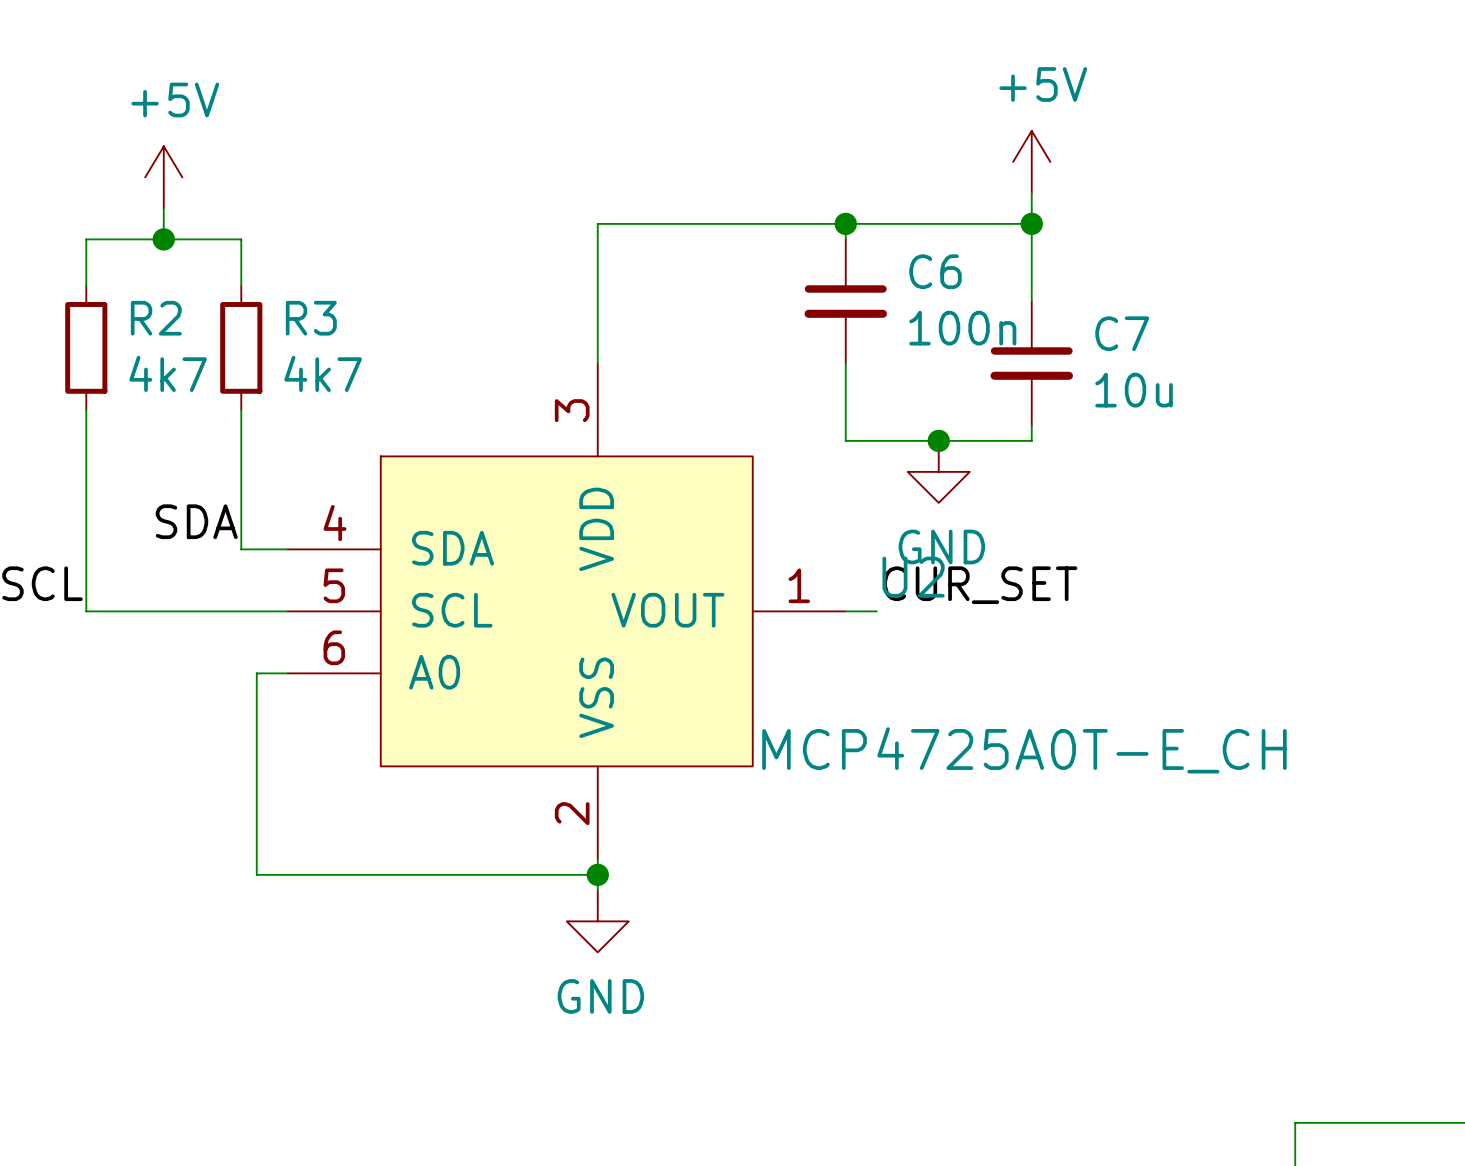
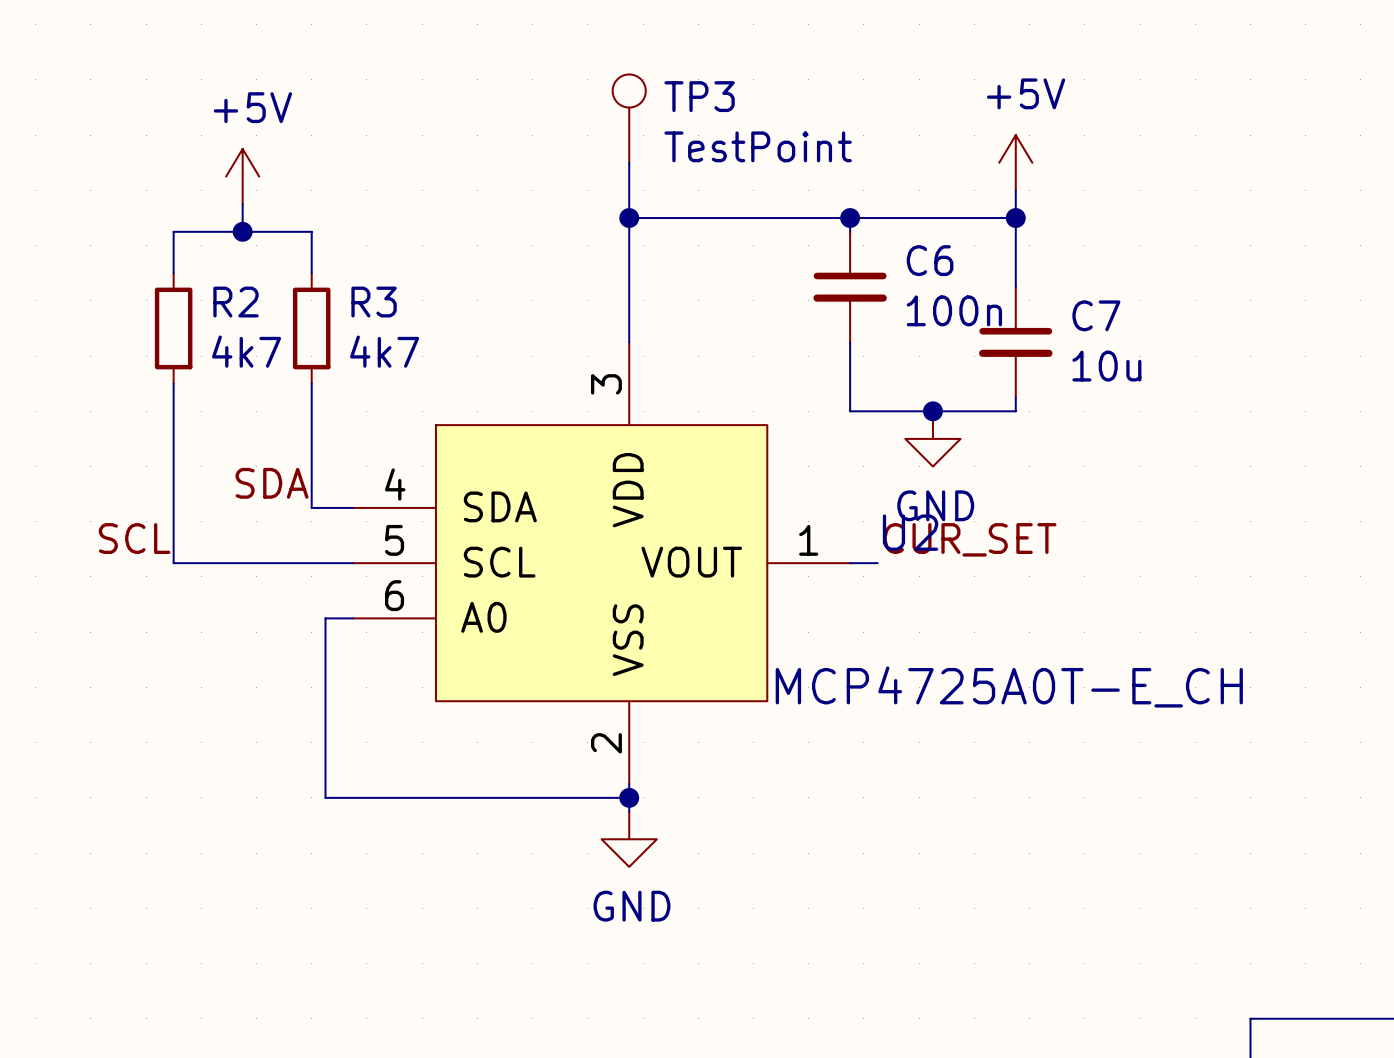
TP3: none -> TestPoint (629, 118)
wire: none -> (629, 162) (629, 218)
junction: none -> (629, 218)

